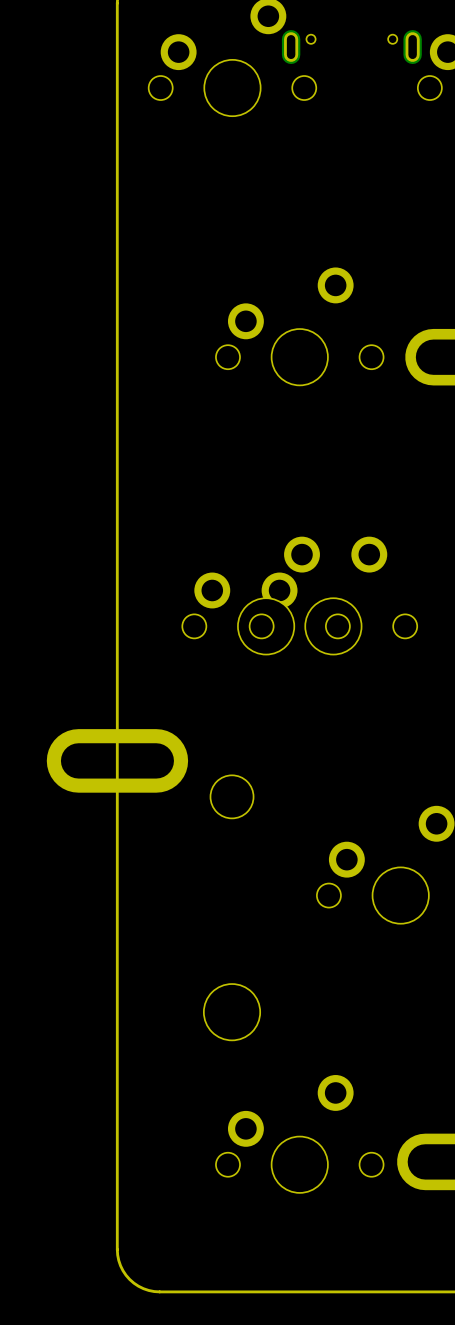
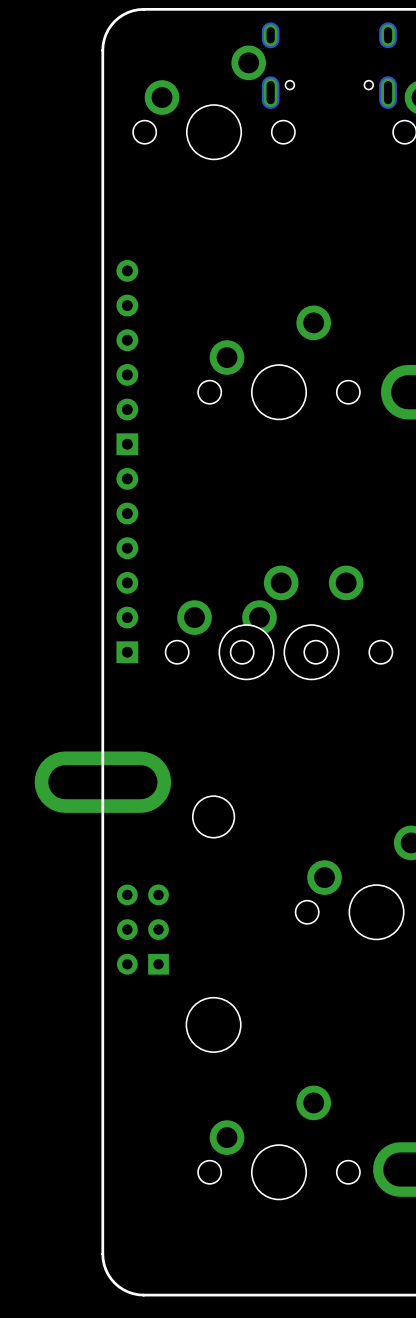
part: none -> (127, 357)
part: none -> (127, 565)
part: none -> (142, 929)

